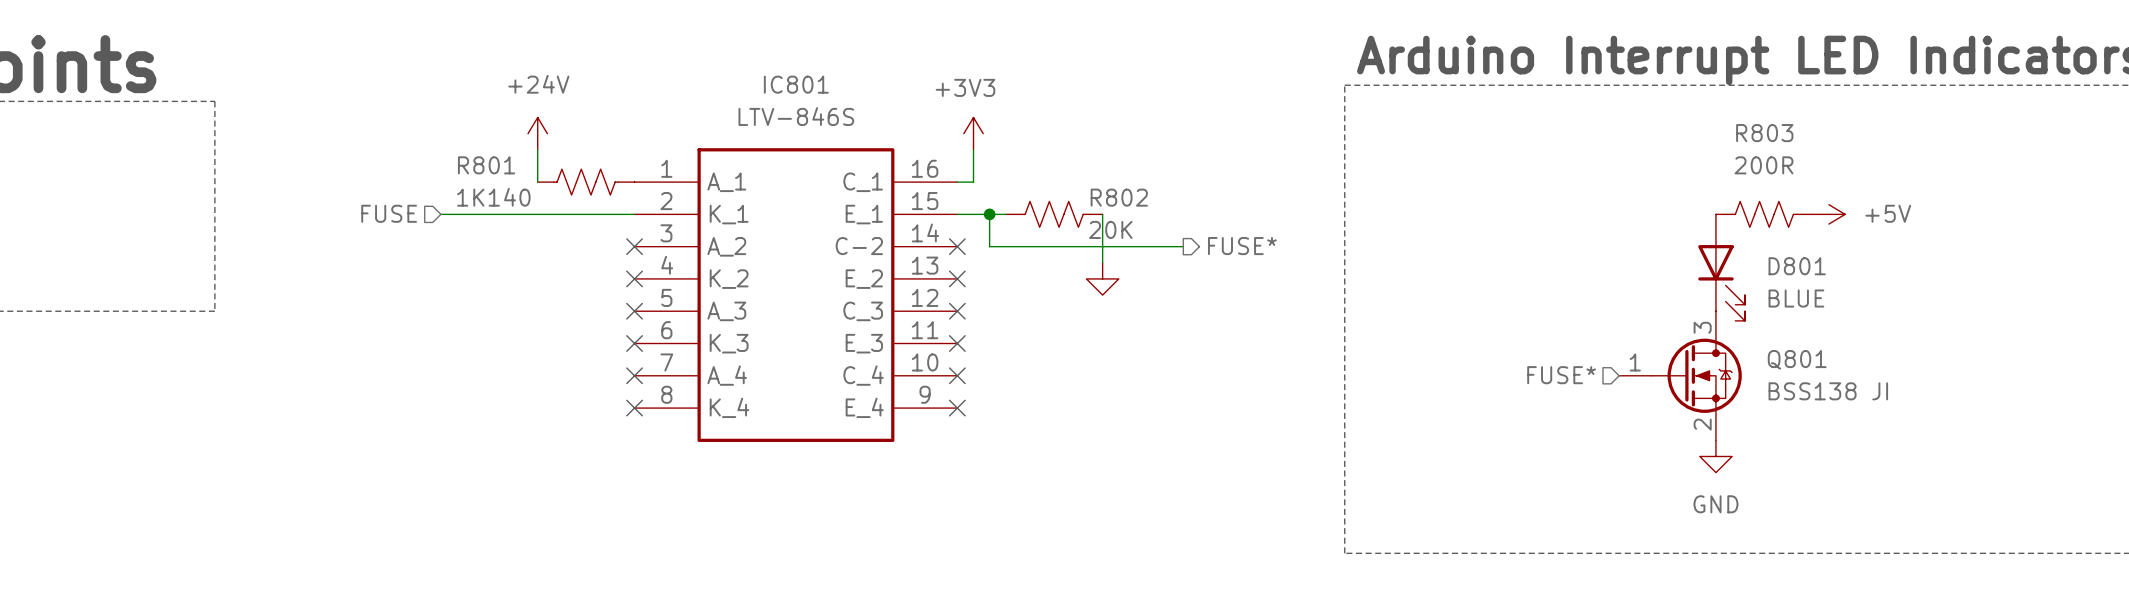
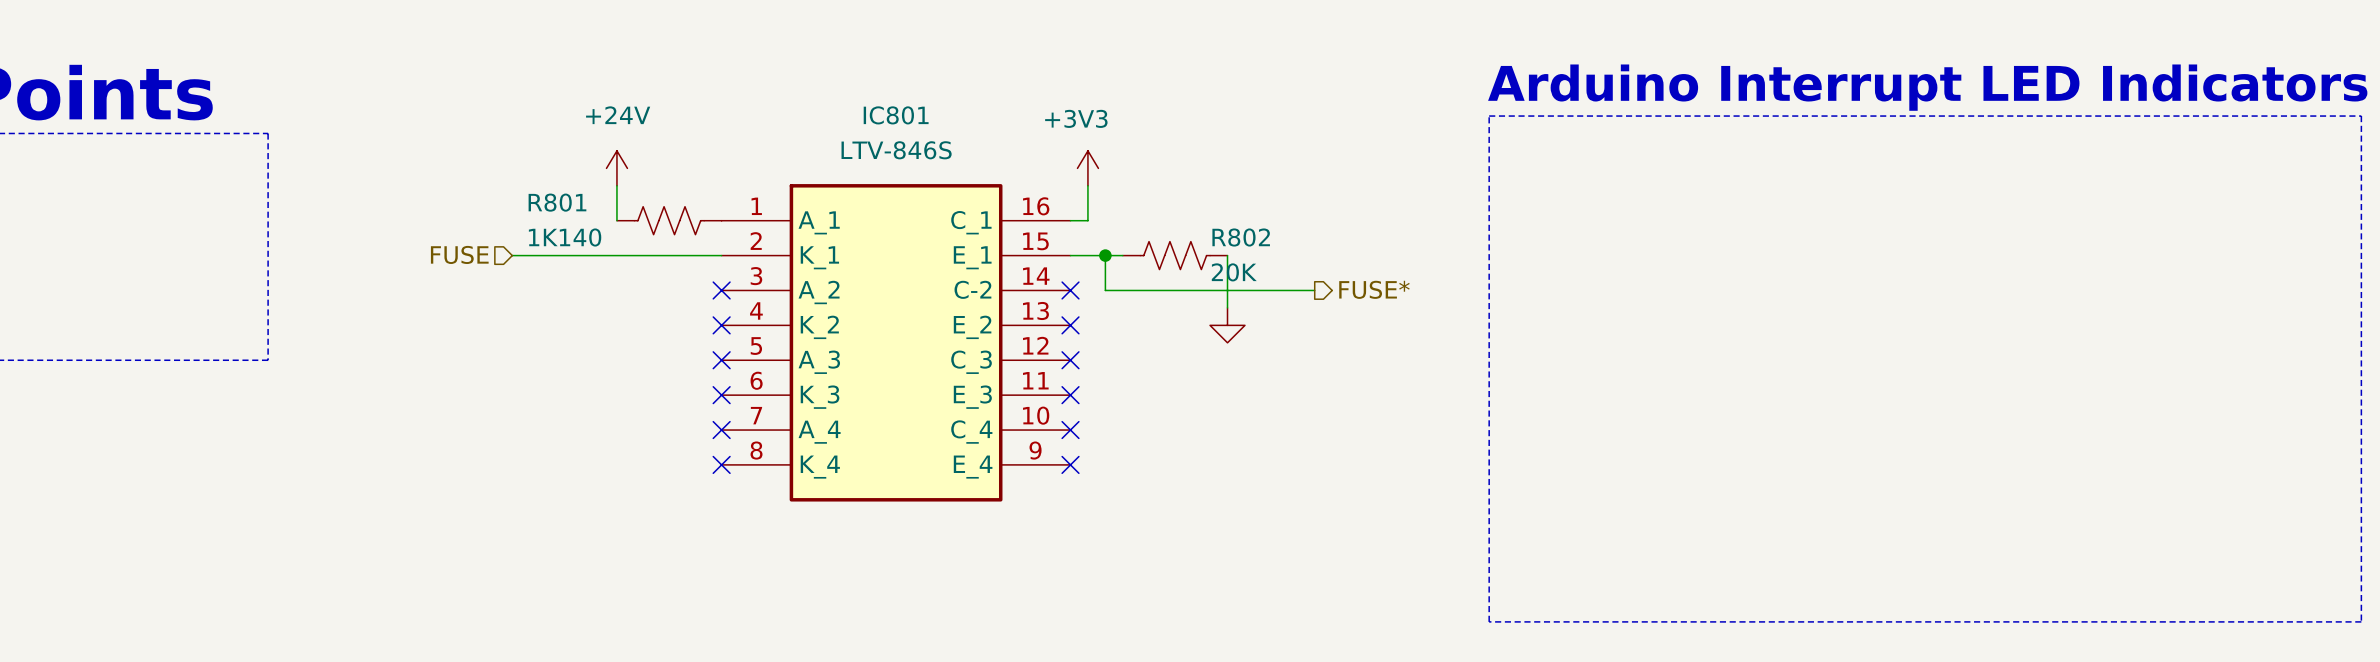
R803: 200R (1764, 214) -> none
power symbol: +5V (1828, 214) -> none
D801: BLUE (1721, 267) -> none
hierarchical label: FUSE* (1561, 375) -> none
Q801: BSS138 JI (1680, 375) -> none
power symbol: GND (1715, 456) -> none

